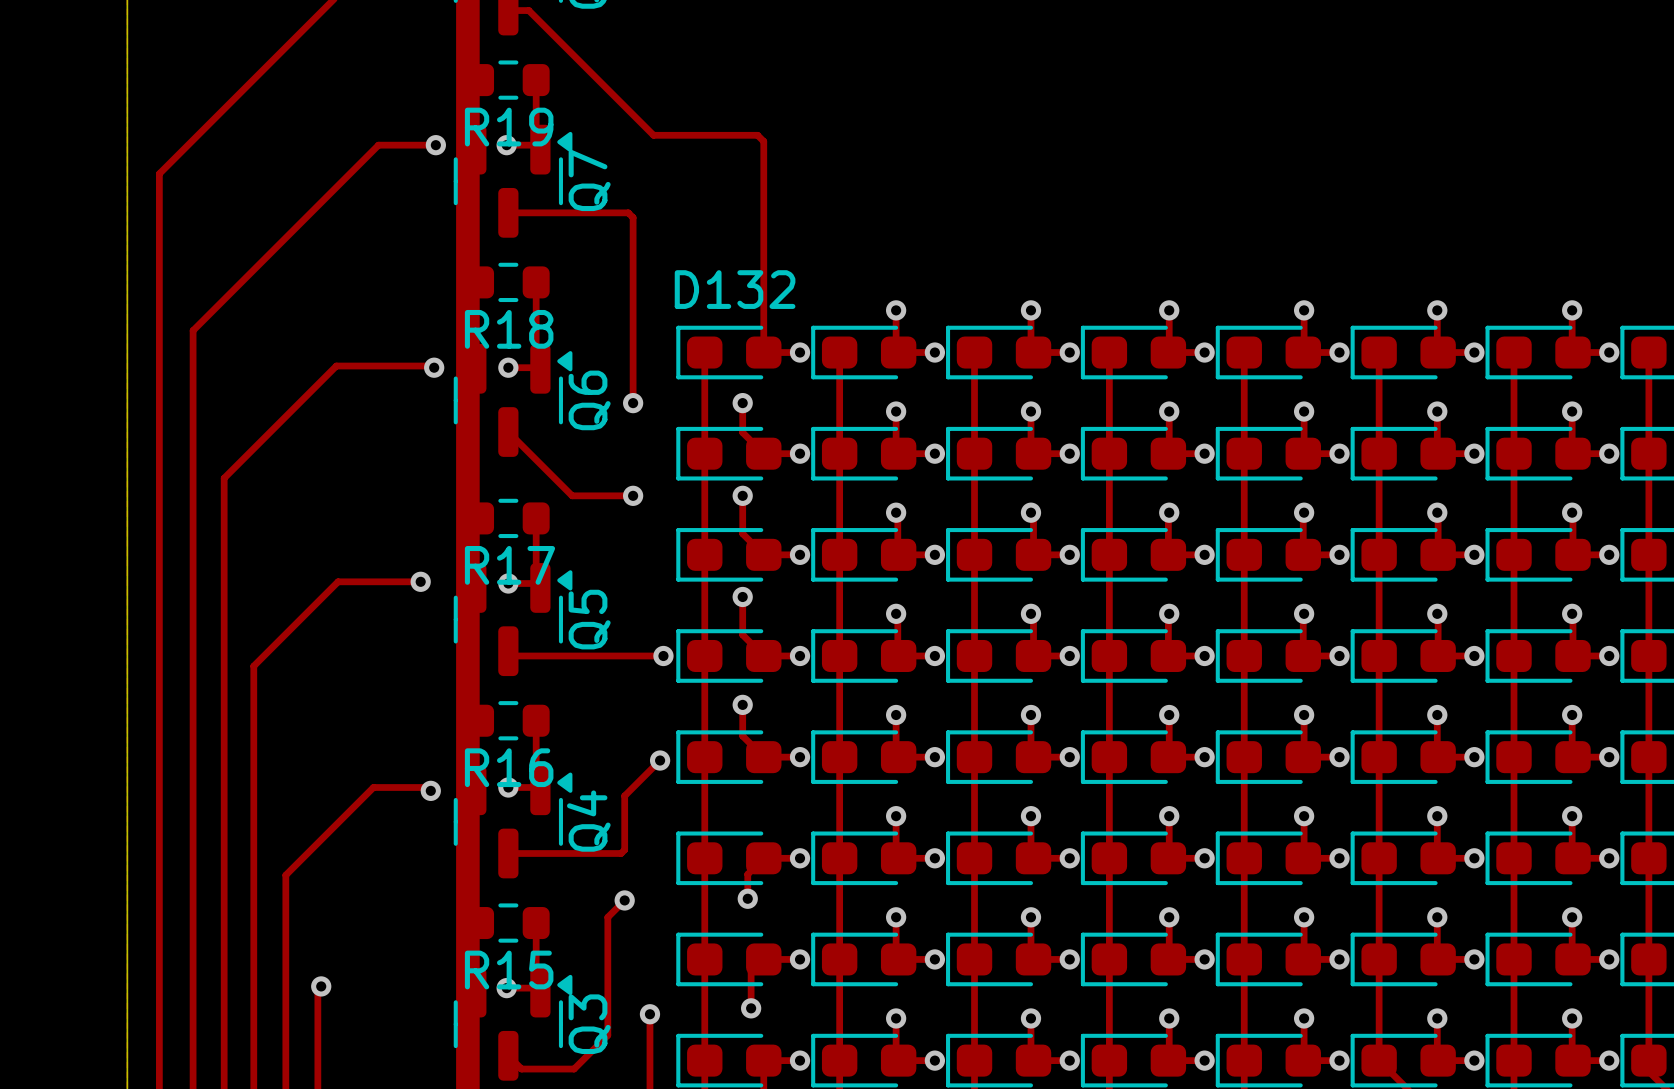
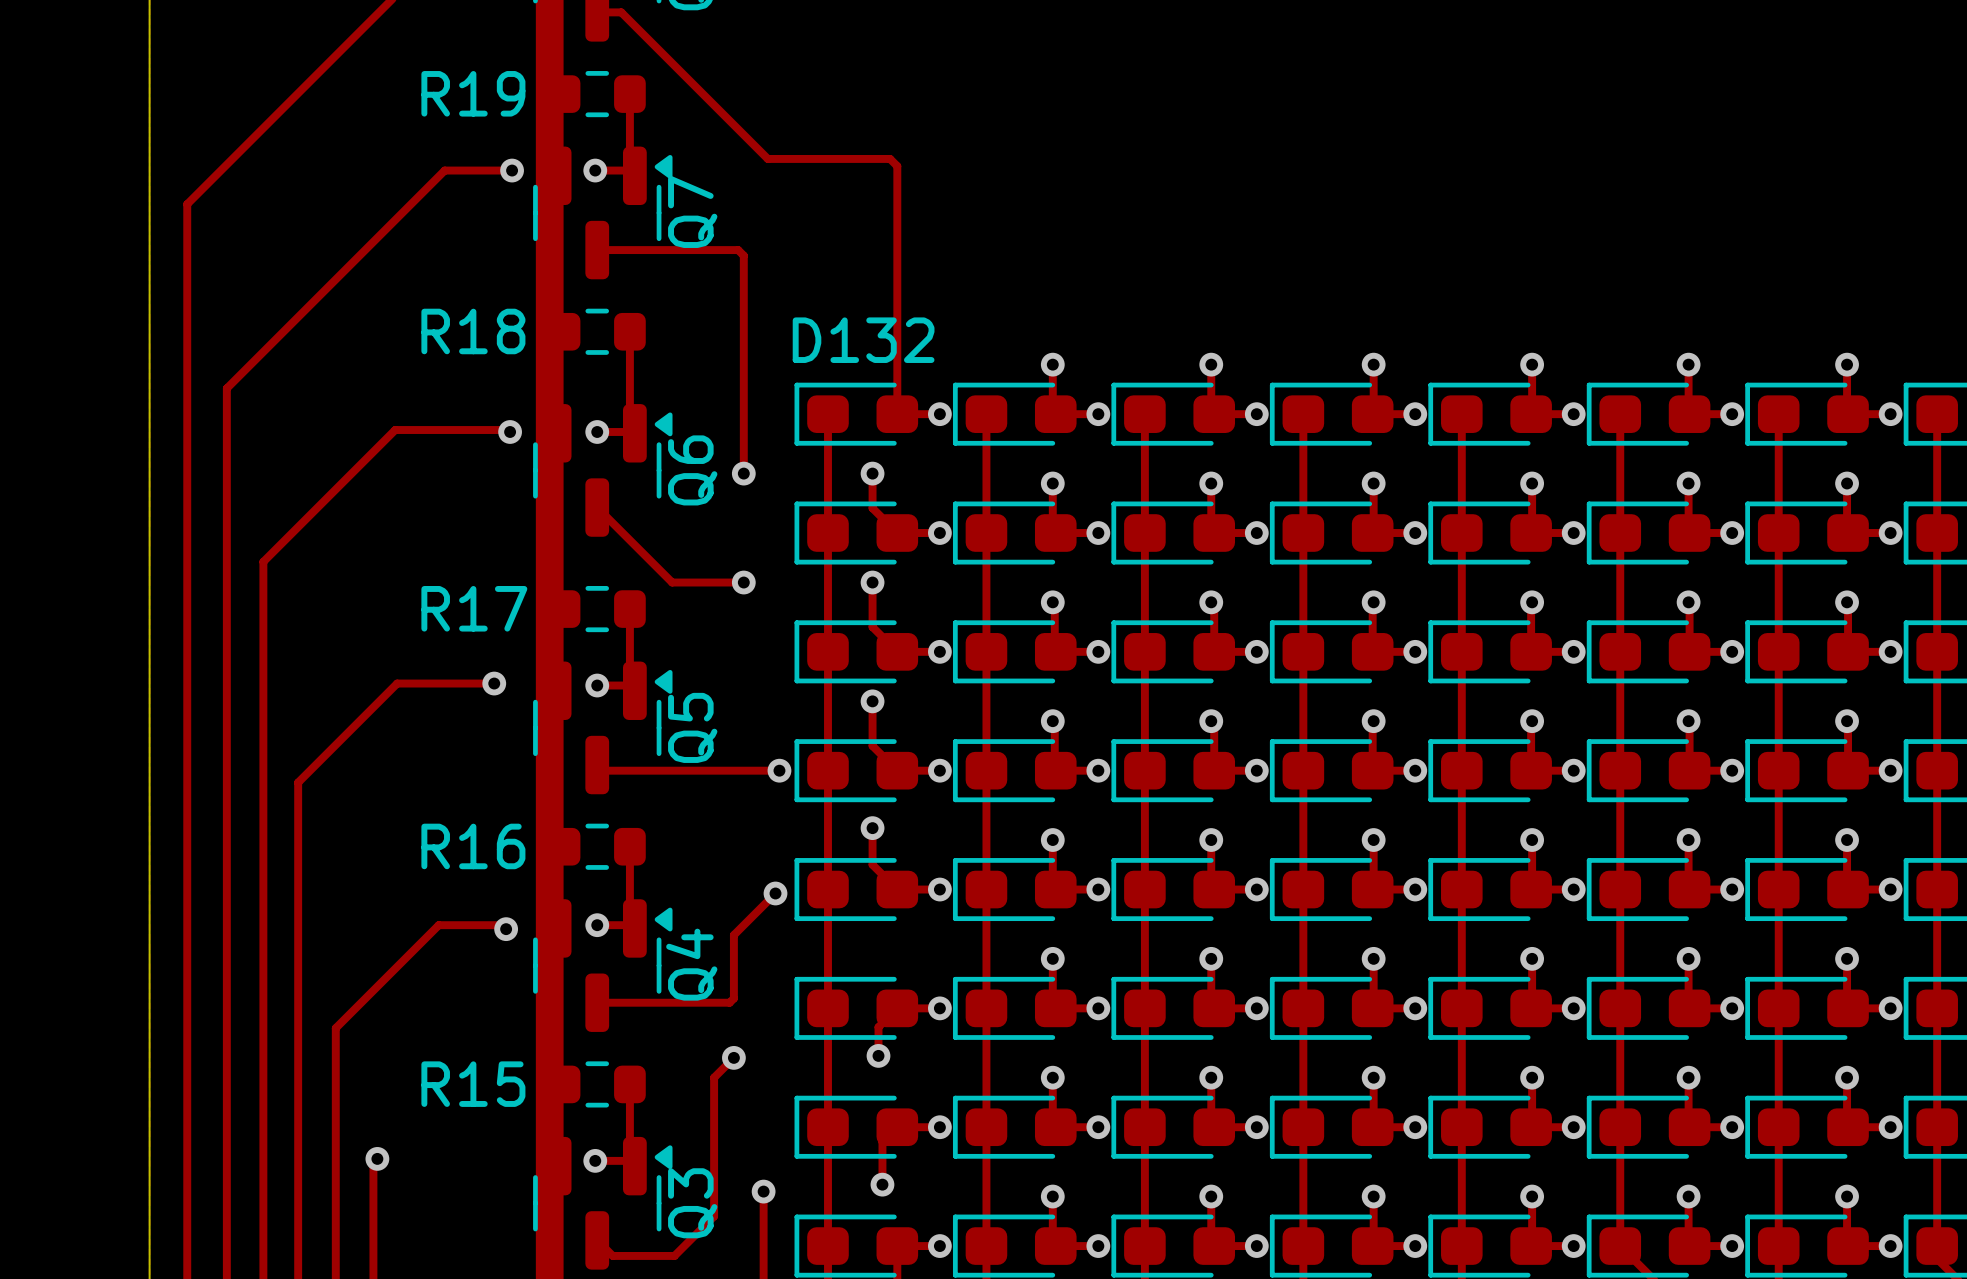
R19 name position: R19 (509, 127) -> R19 (473, 93)
R18 name position: R18 (509, 329) -> R18 (473, 331)
R17 name position: R17 (509, 565) -> R17 (474, 608)
R16 name position: R16 (509, 767) -> R16 (473, 846)
R15 name position: R15 (509, 969) -> R15 (473, 1084)

